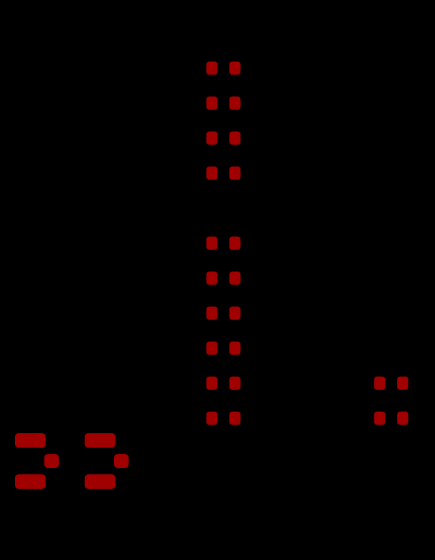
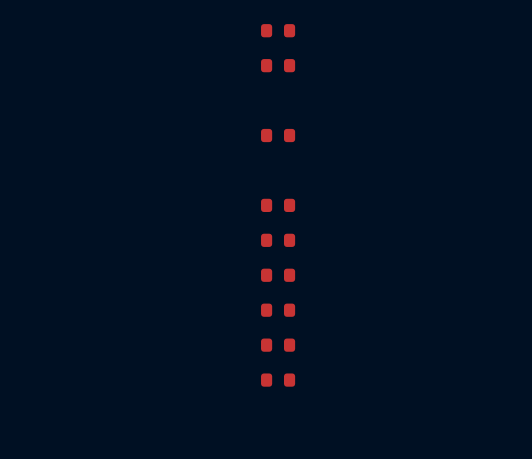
part: (223, 138) -> none
part: (391, 383) -> none
part: (391, 418) -> none
part: (36, 461) -> none
part: (106, 461) -> none

